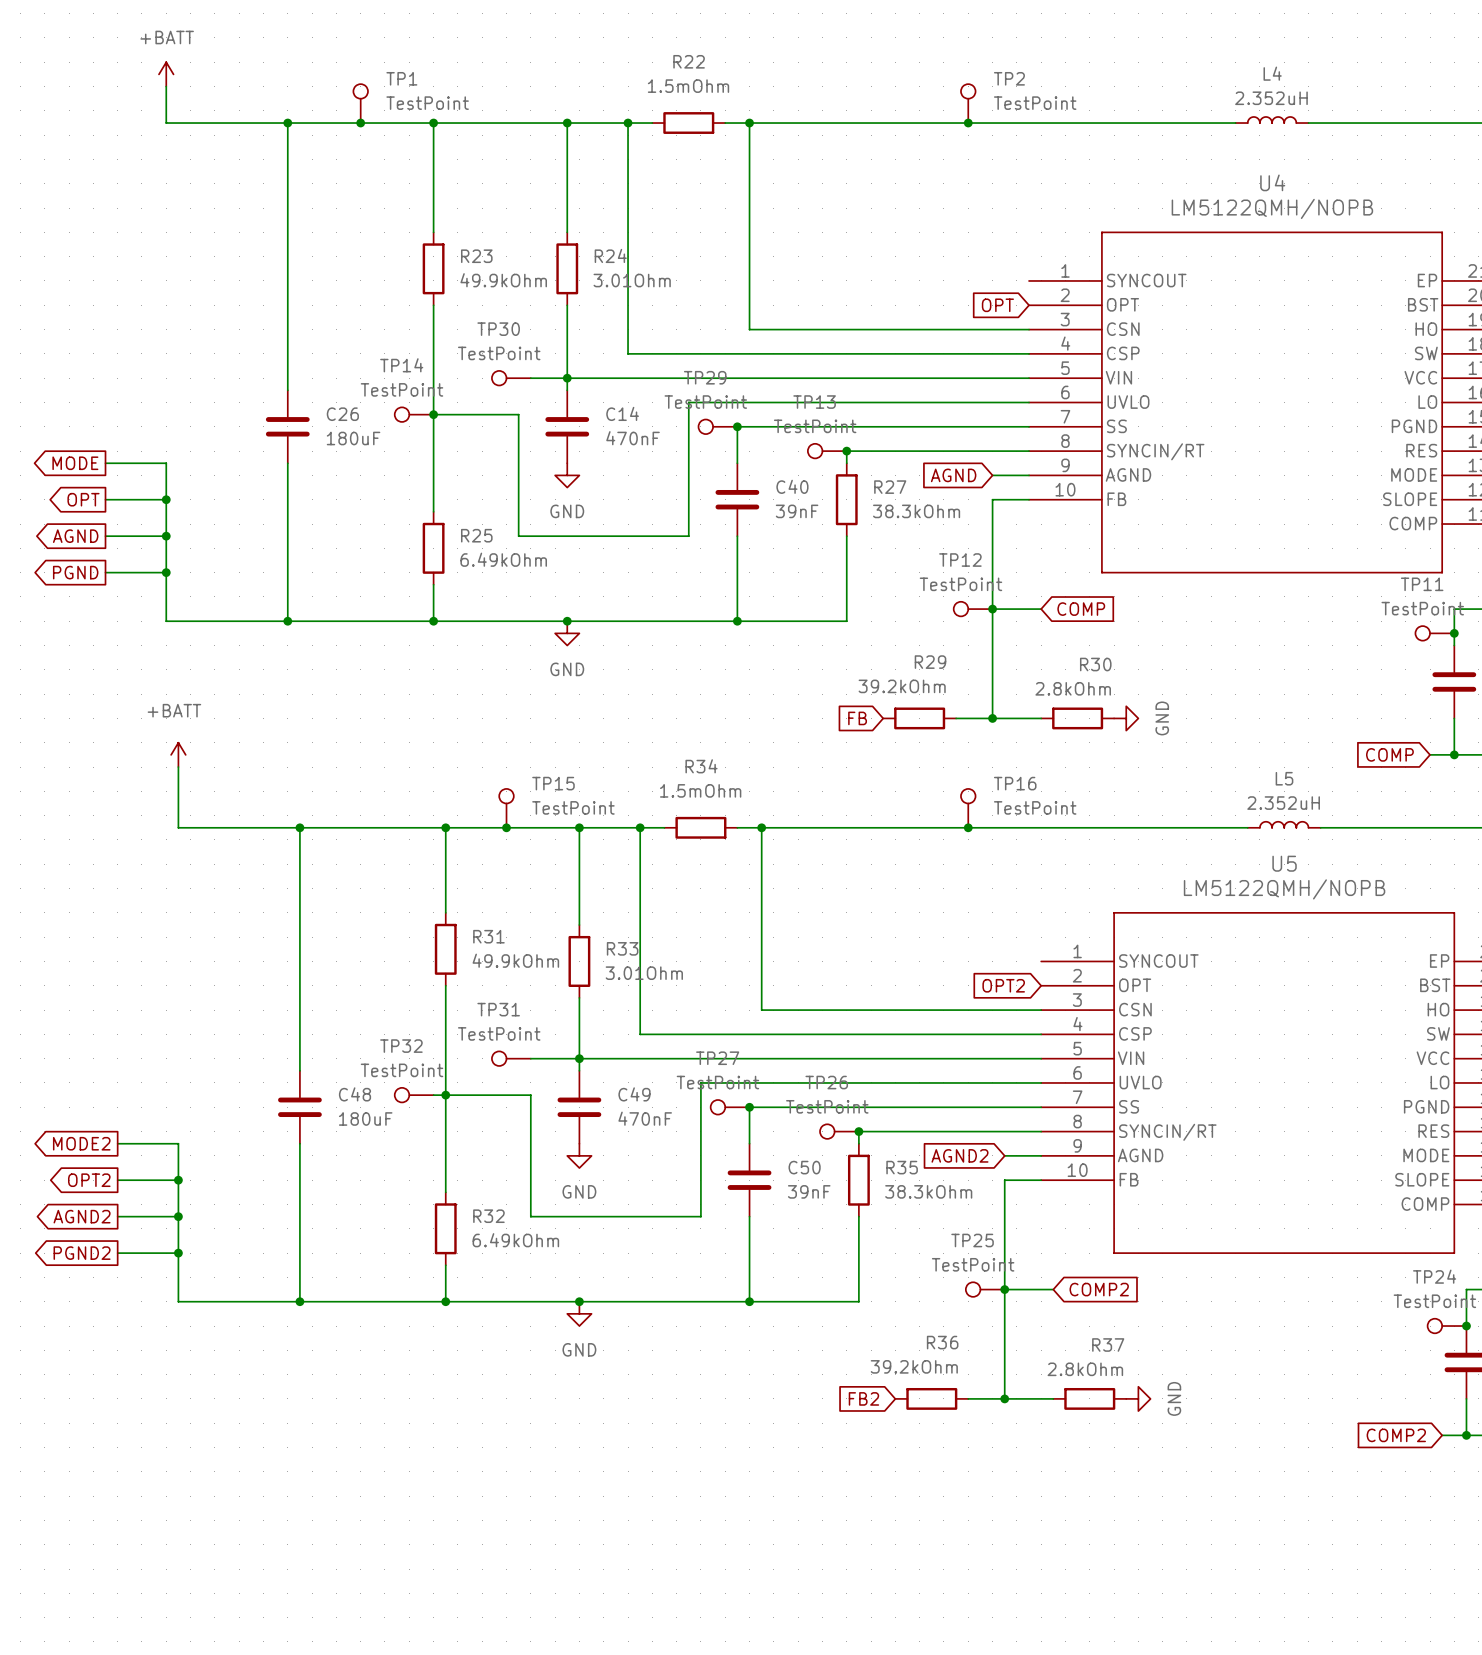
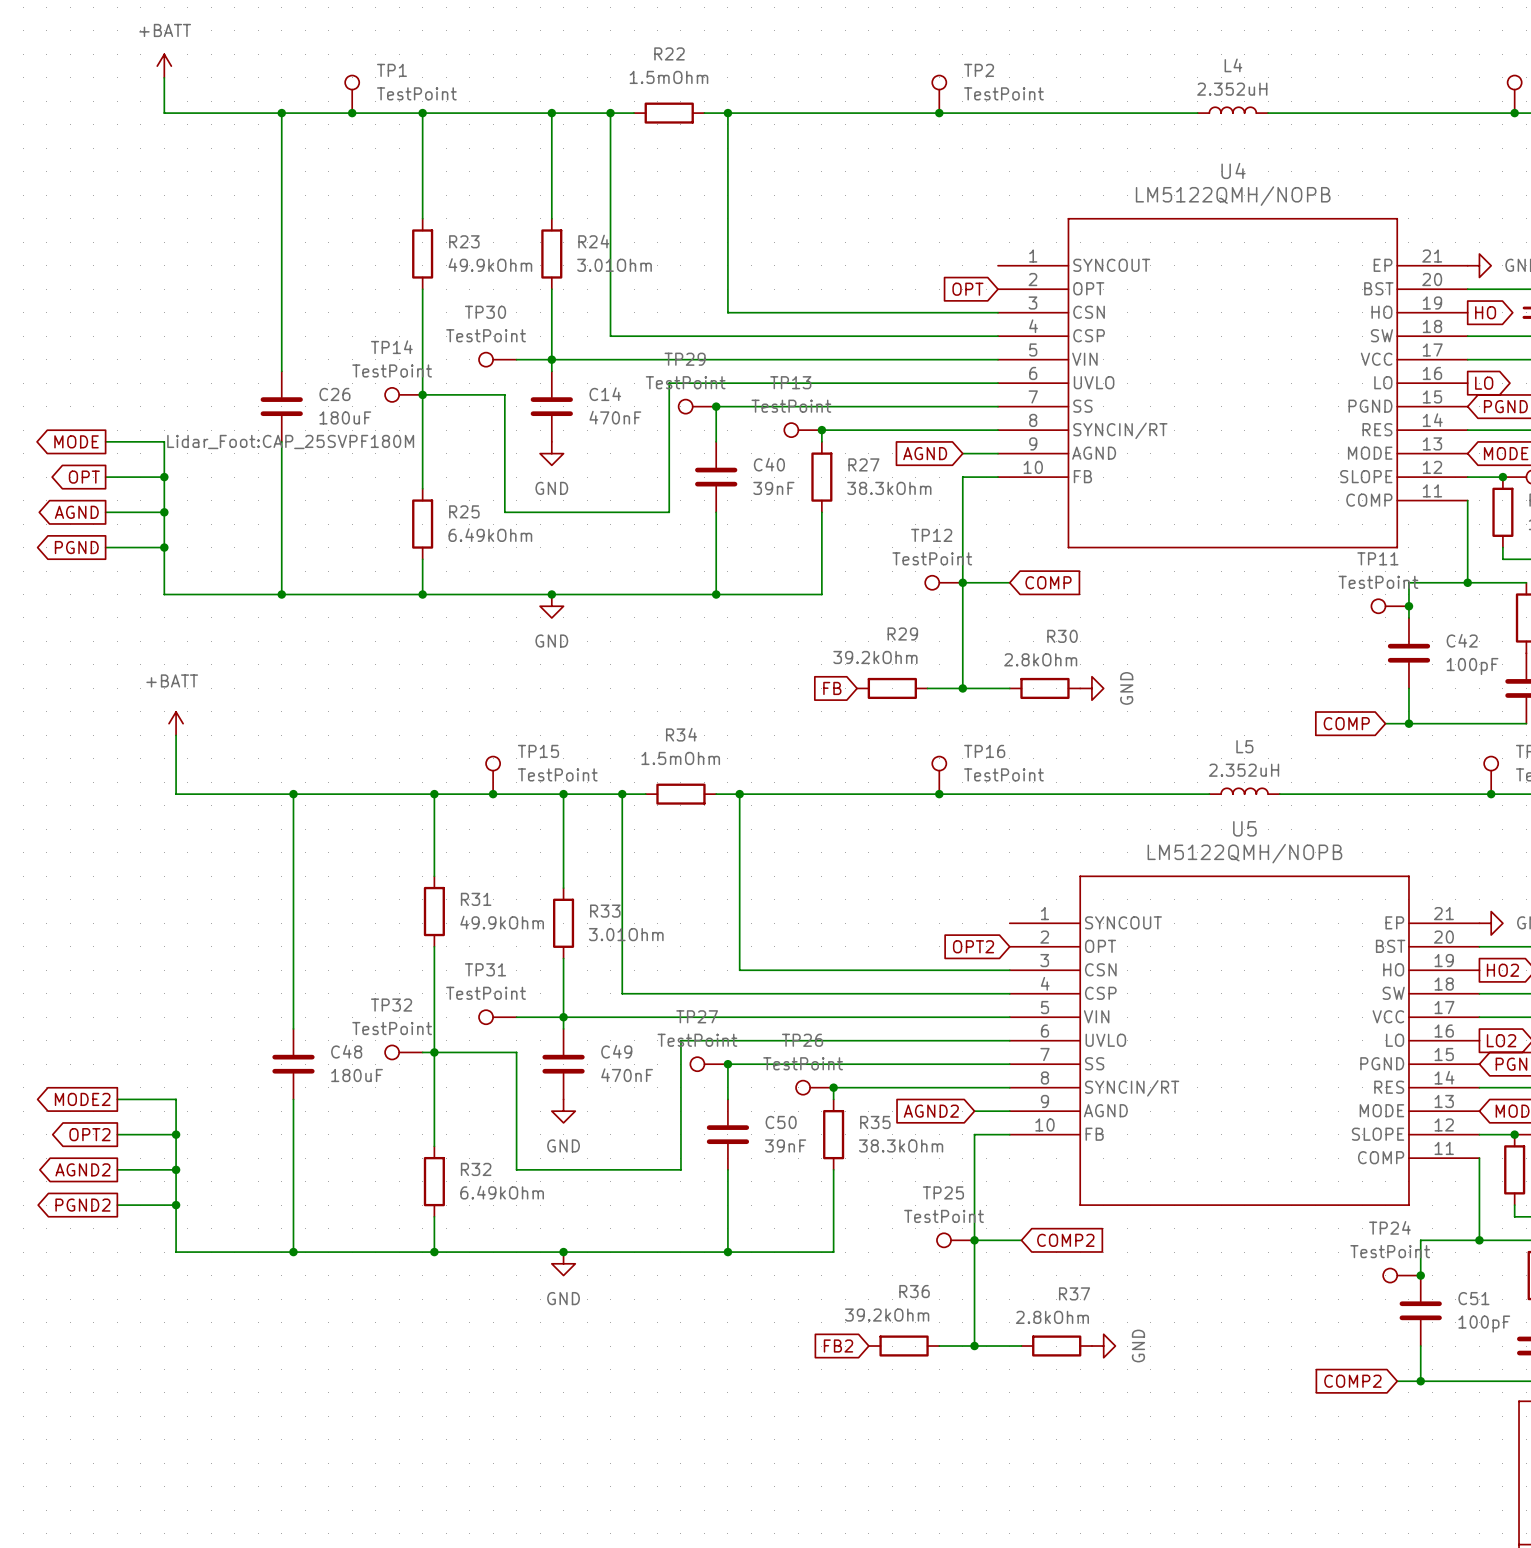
C26 text: none -> Lidar_Foot:CAP_25SVPF180M (290, 441)

